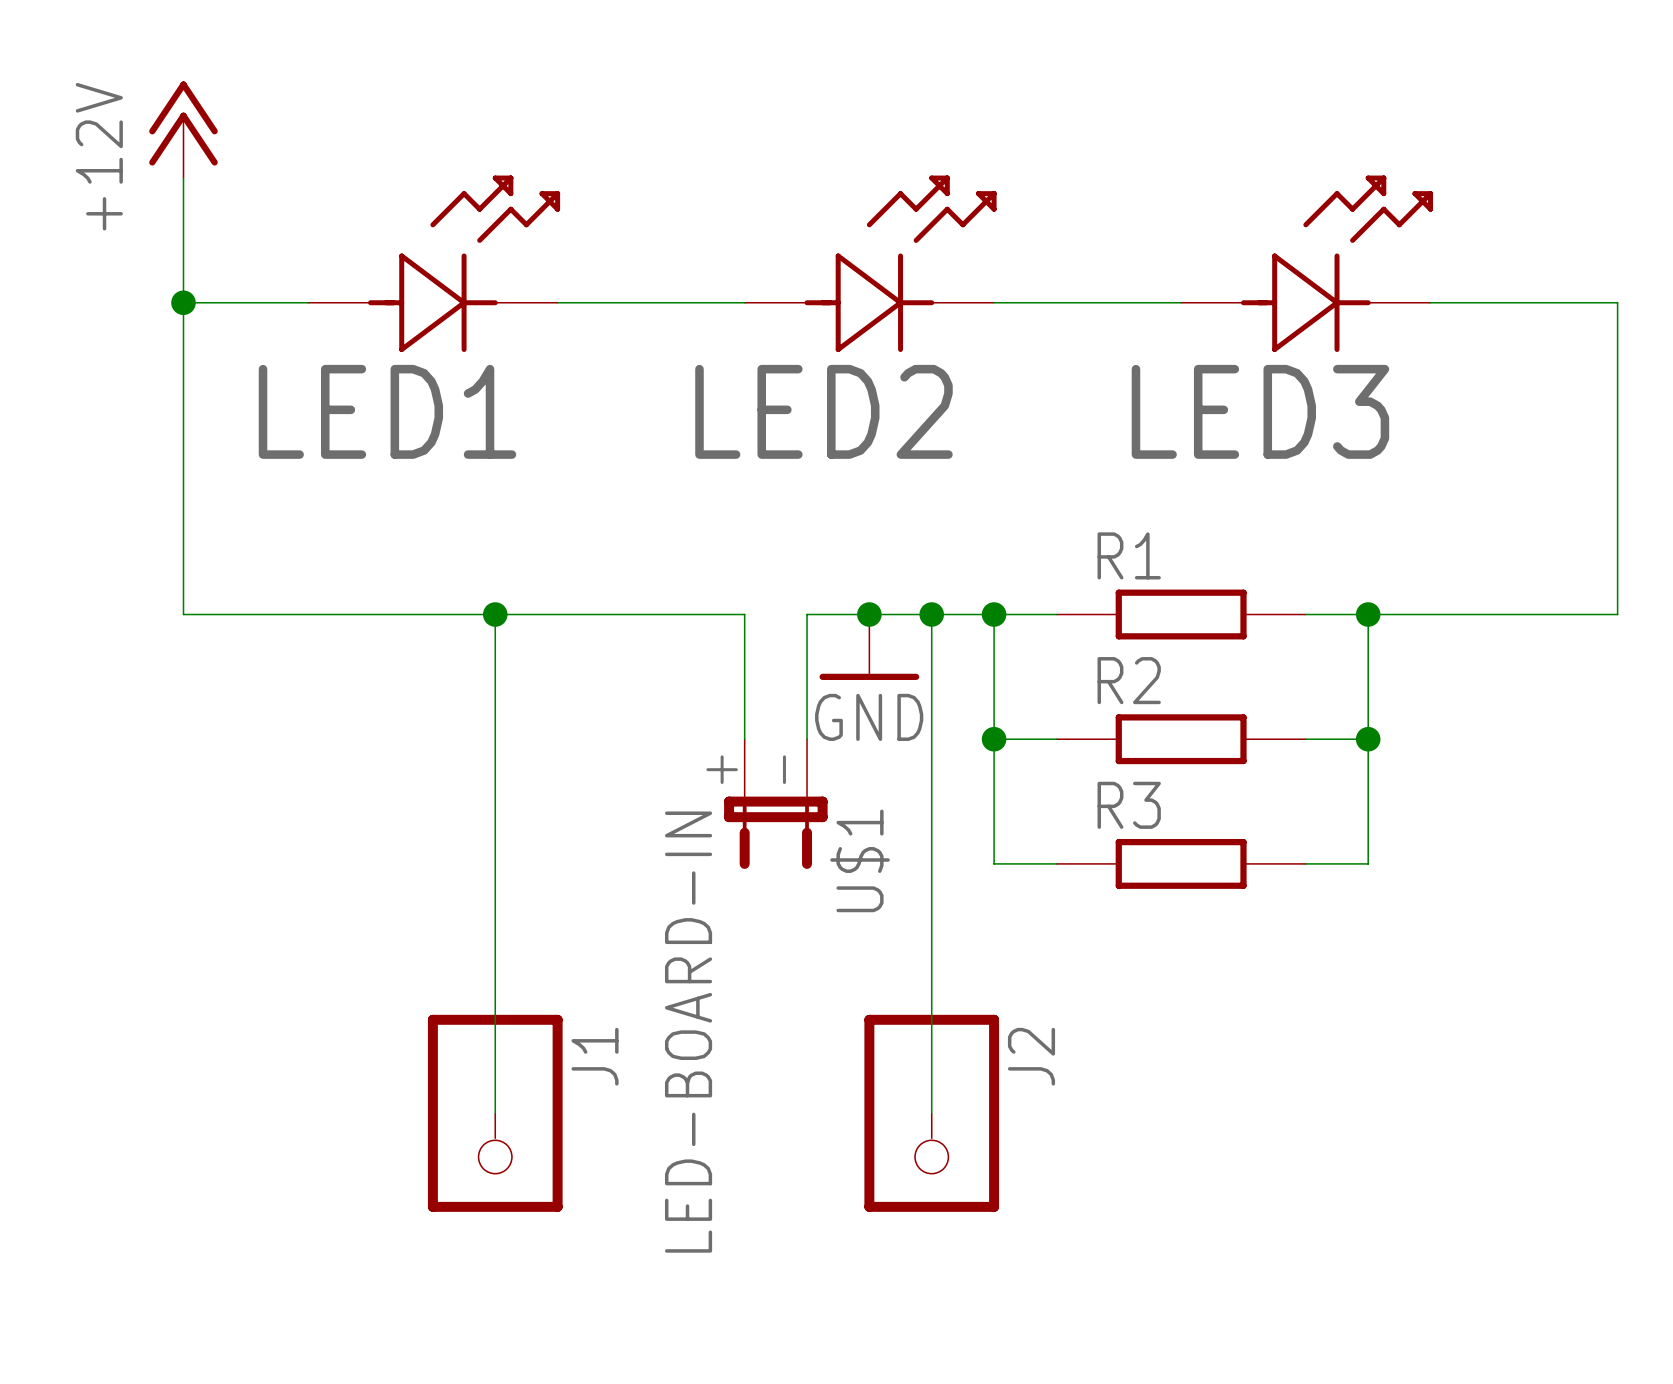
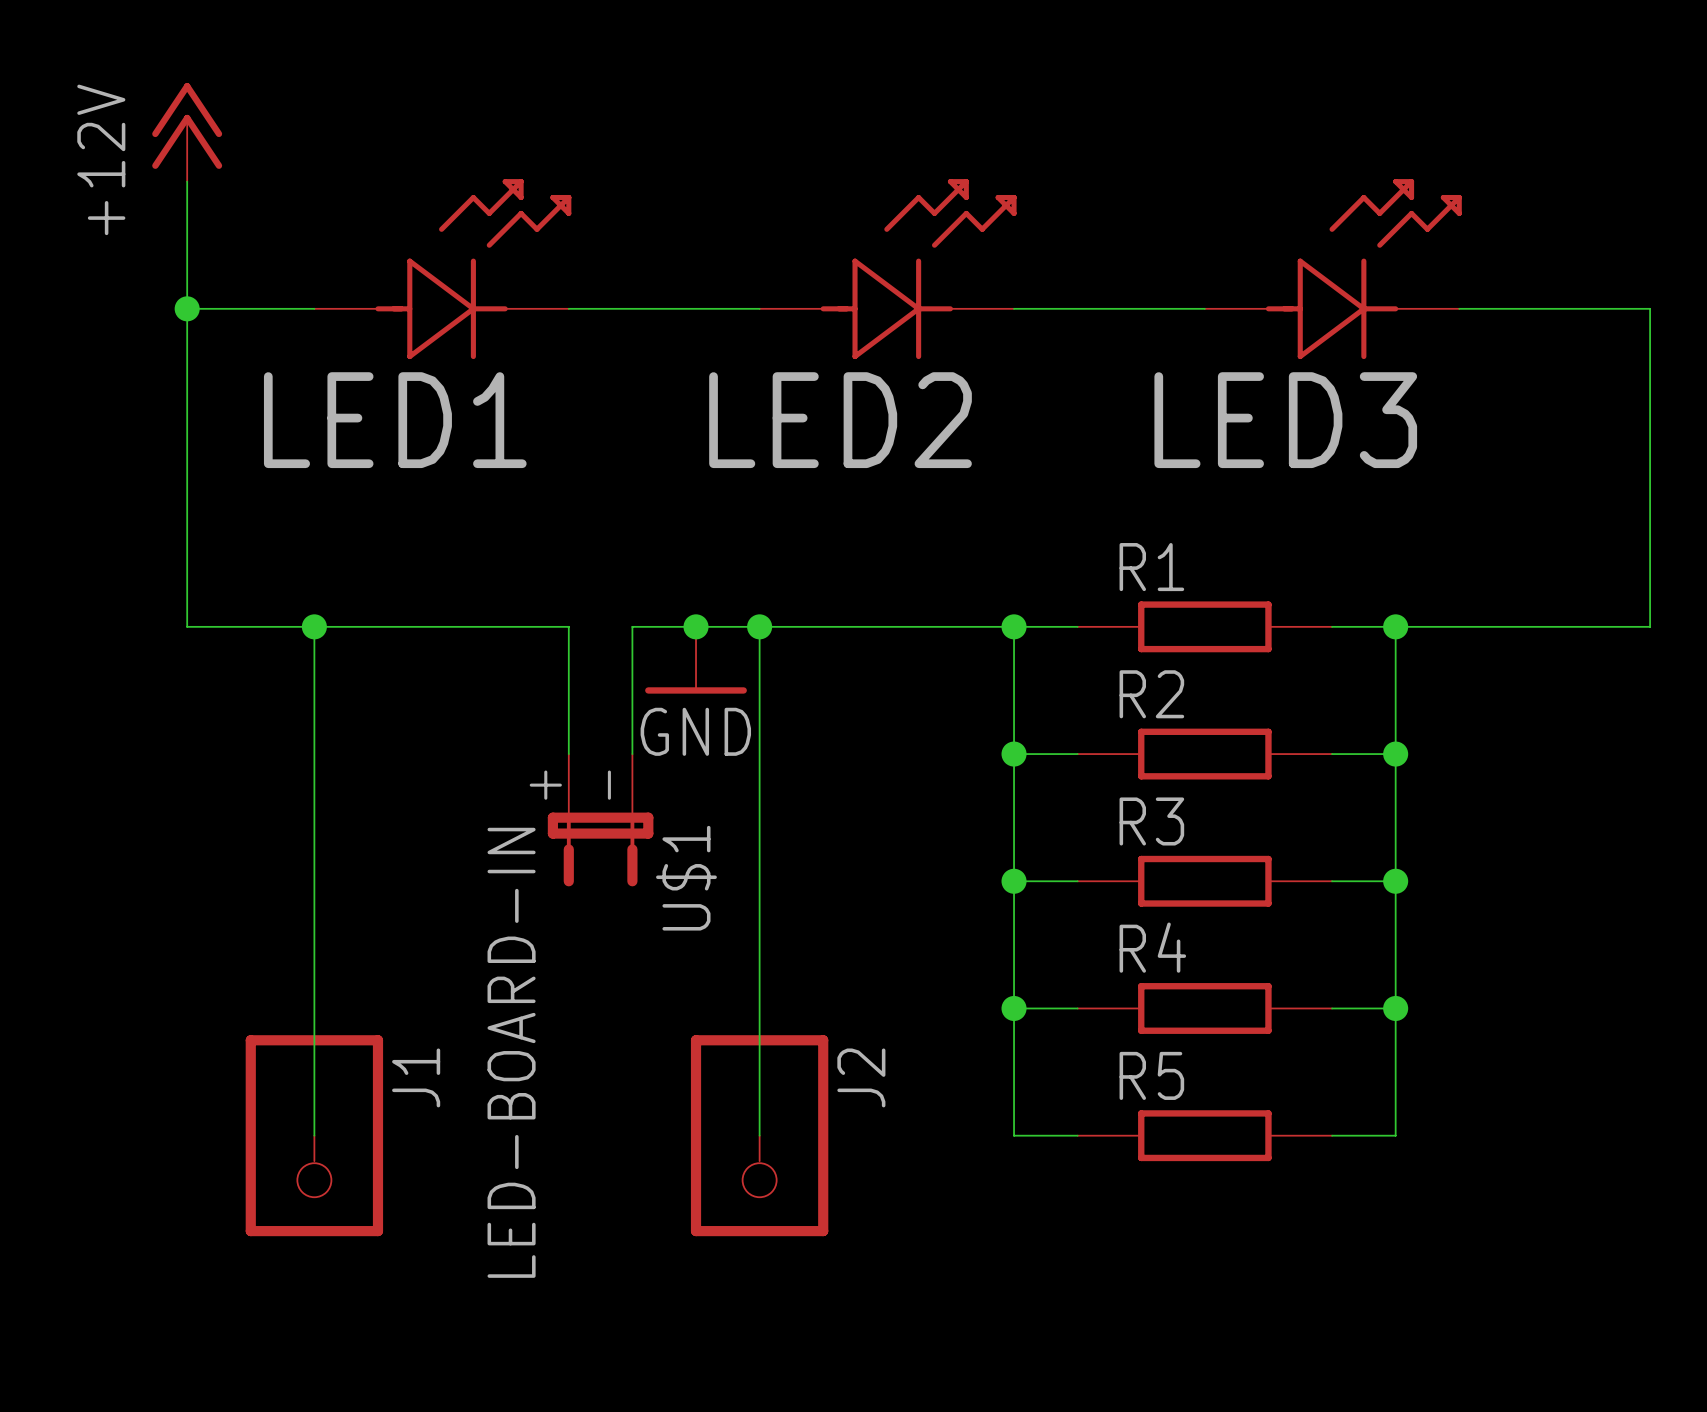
junction: none -> (314, 626)
wire: (495, 614) (495, 1113) -> (314, 626) (314, 1135)
junction: (495, 614) -> none
wire: (557, 614) (619, 614) -> (568, 626) (568, 754)
wire: none -> (632, 626) (632, 754)
junction: none -> (696, 626)
junction: none -> (759, 626)
wire: (807, 614) (807, 739) -> (823, 626) (759, 626)
junction: (869, 614) -> none
wire: (931, 614) (931, 1113) -> none
junction: (931, 614) -> none
power symbol position: GND (869, 647) -> GND (696, 660)
wire: none -> (759, 754) (759, 1135)
U$1 position: (775, 804) -> (600, 820)
wire: none -> (1014, 881) (1014, 1135) (1077, 1135)
junction: none -> (1014, 881)
wire: none -> (1395, 881) (1395, 1135) (1332, 1135)
junction: none -> (1395, 881)
wire: none -> (1014, 1008) (1077, 1008)
junction: none -> (1014, 1008)
R4: none -> (1204, 1008)
wire: none -> (1332, 1008) (1395, 1008)
junction: none -> (1395, 1008)
J1 position: (495, 1113) -> (314, 1135)
J2 position: (931, 1113) -> (759, 1135)
R5: none -> (1204, 1135)

